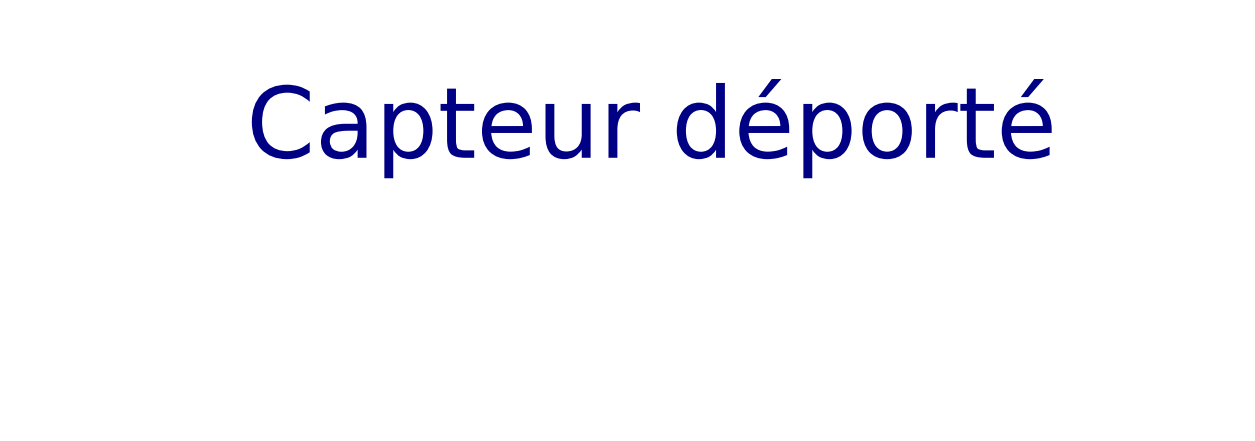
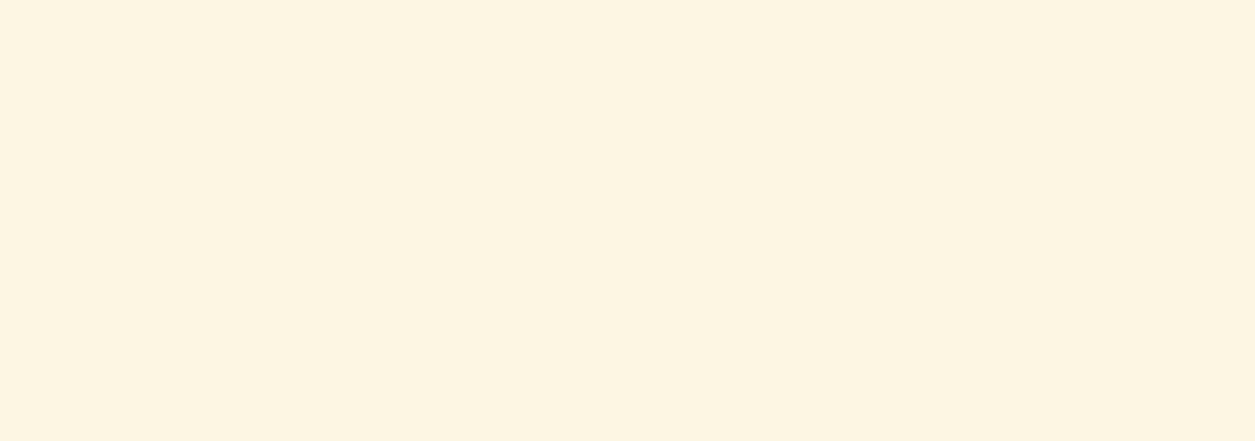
text: Capteur déporté (651, 128) -> none

